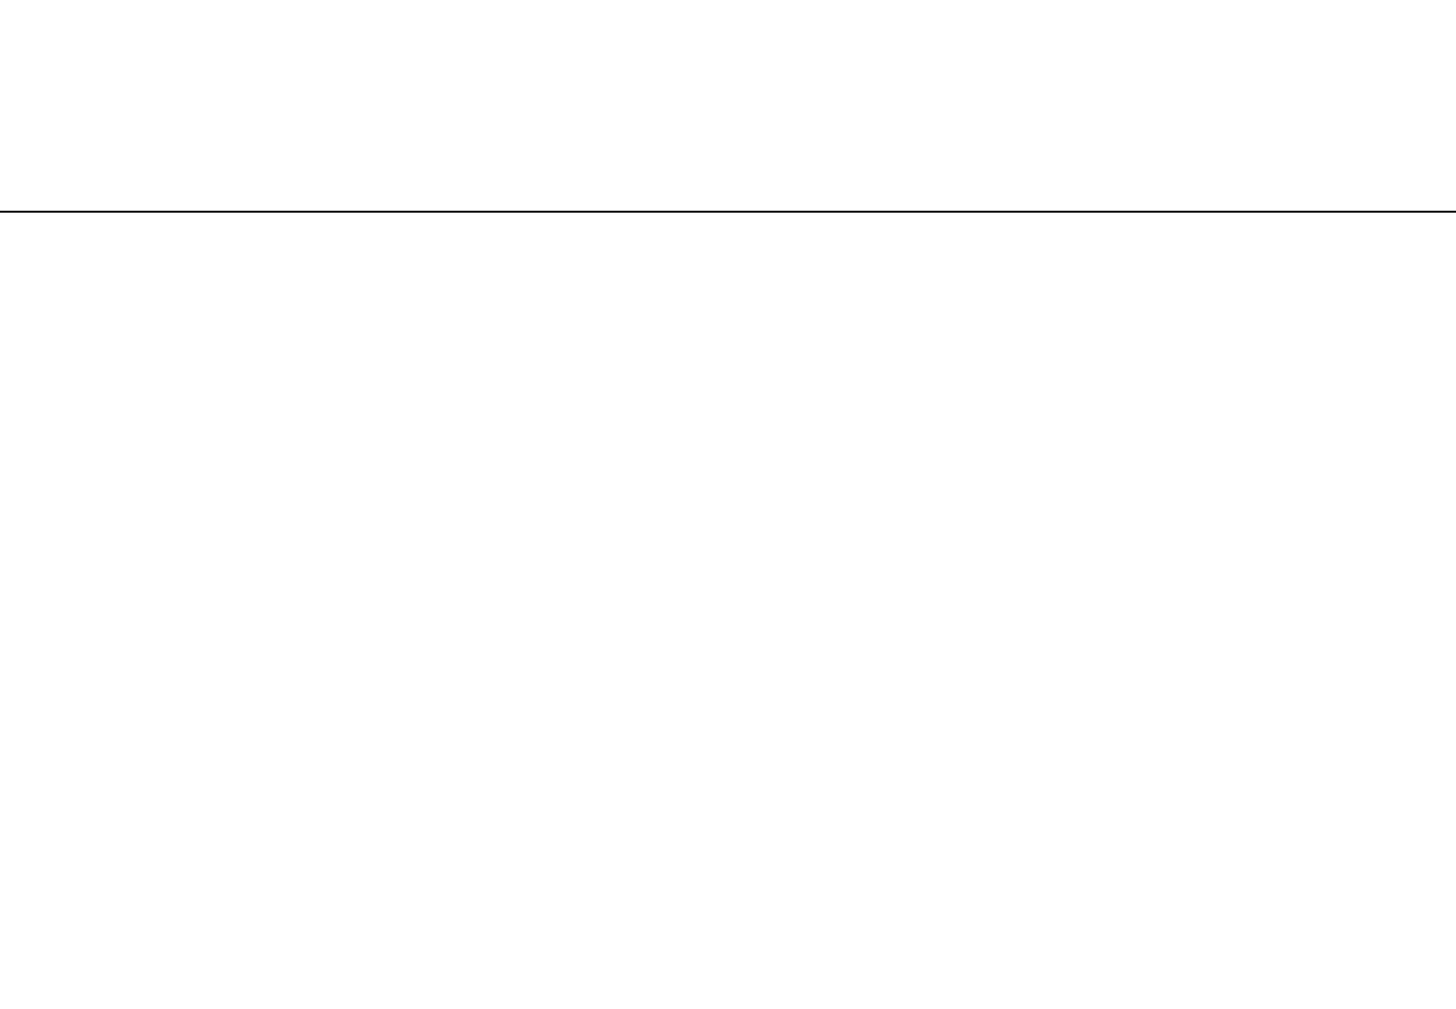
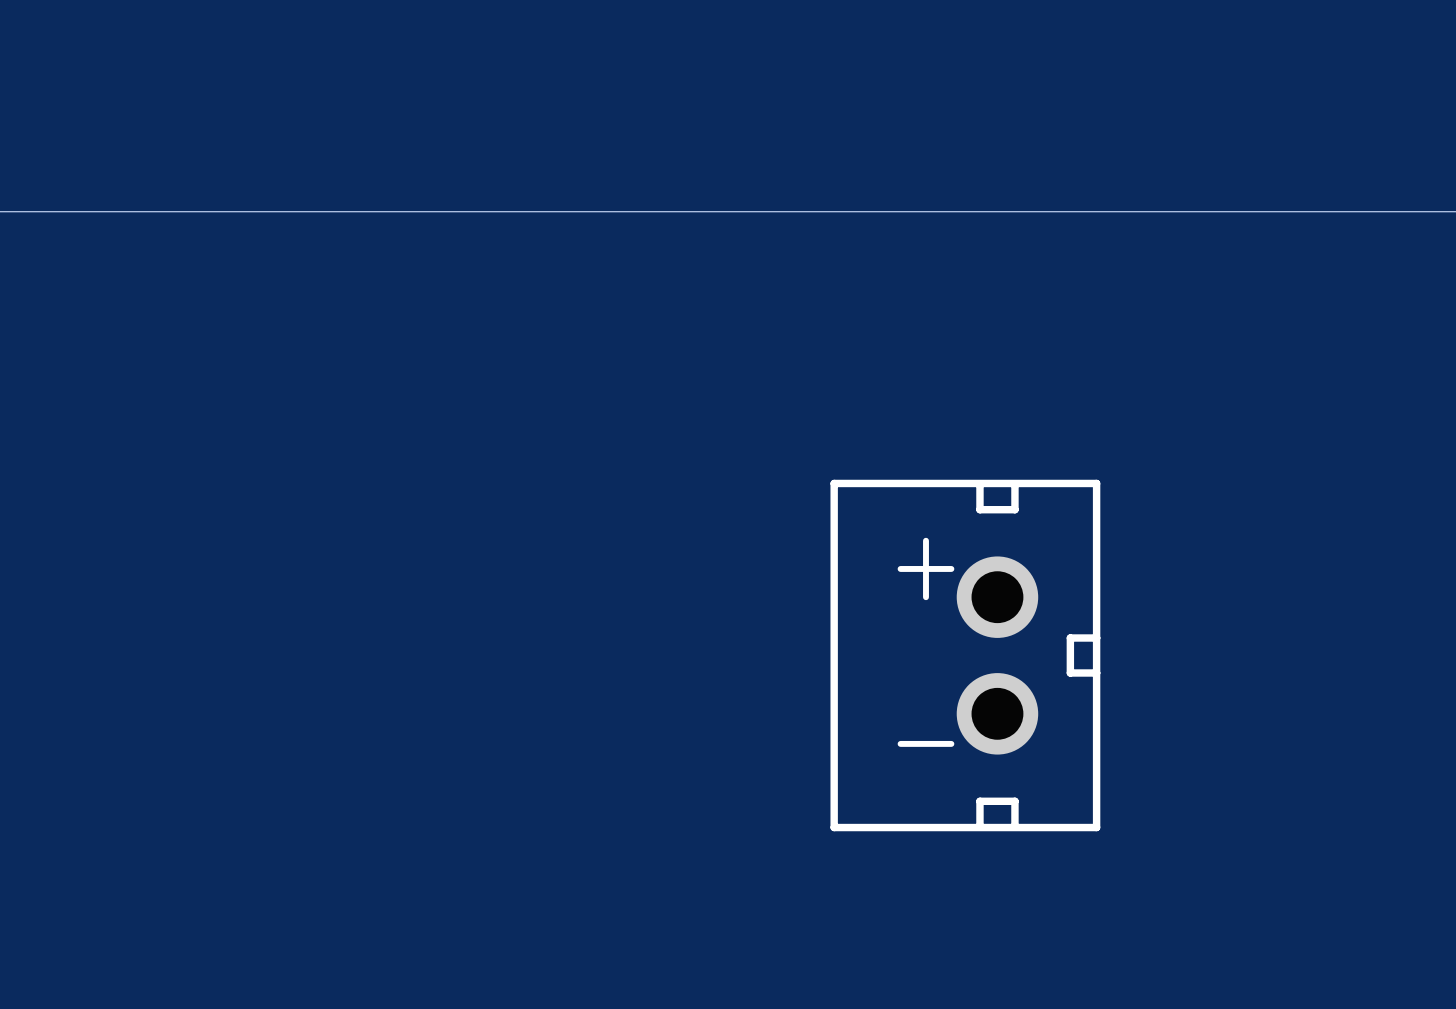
part: none -> (965, 655)

